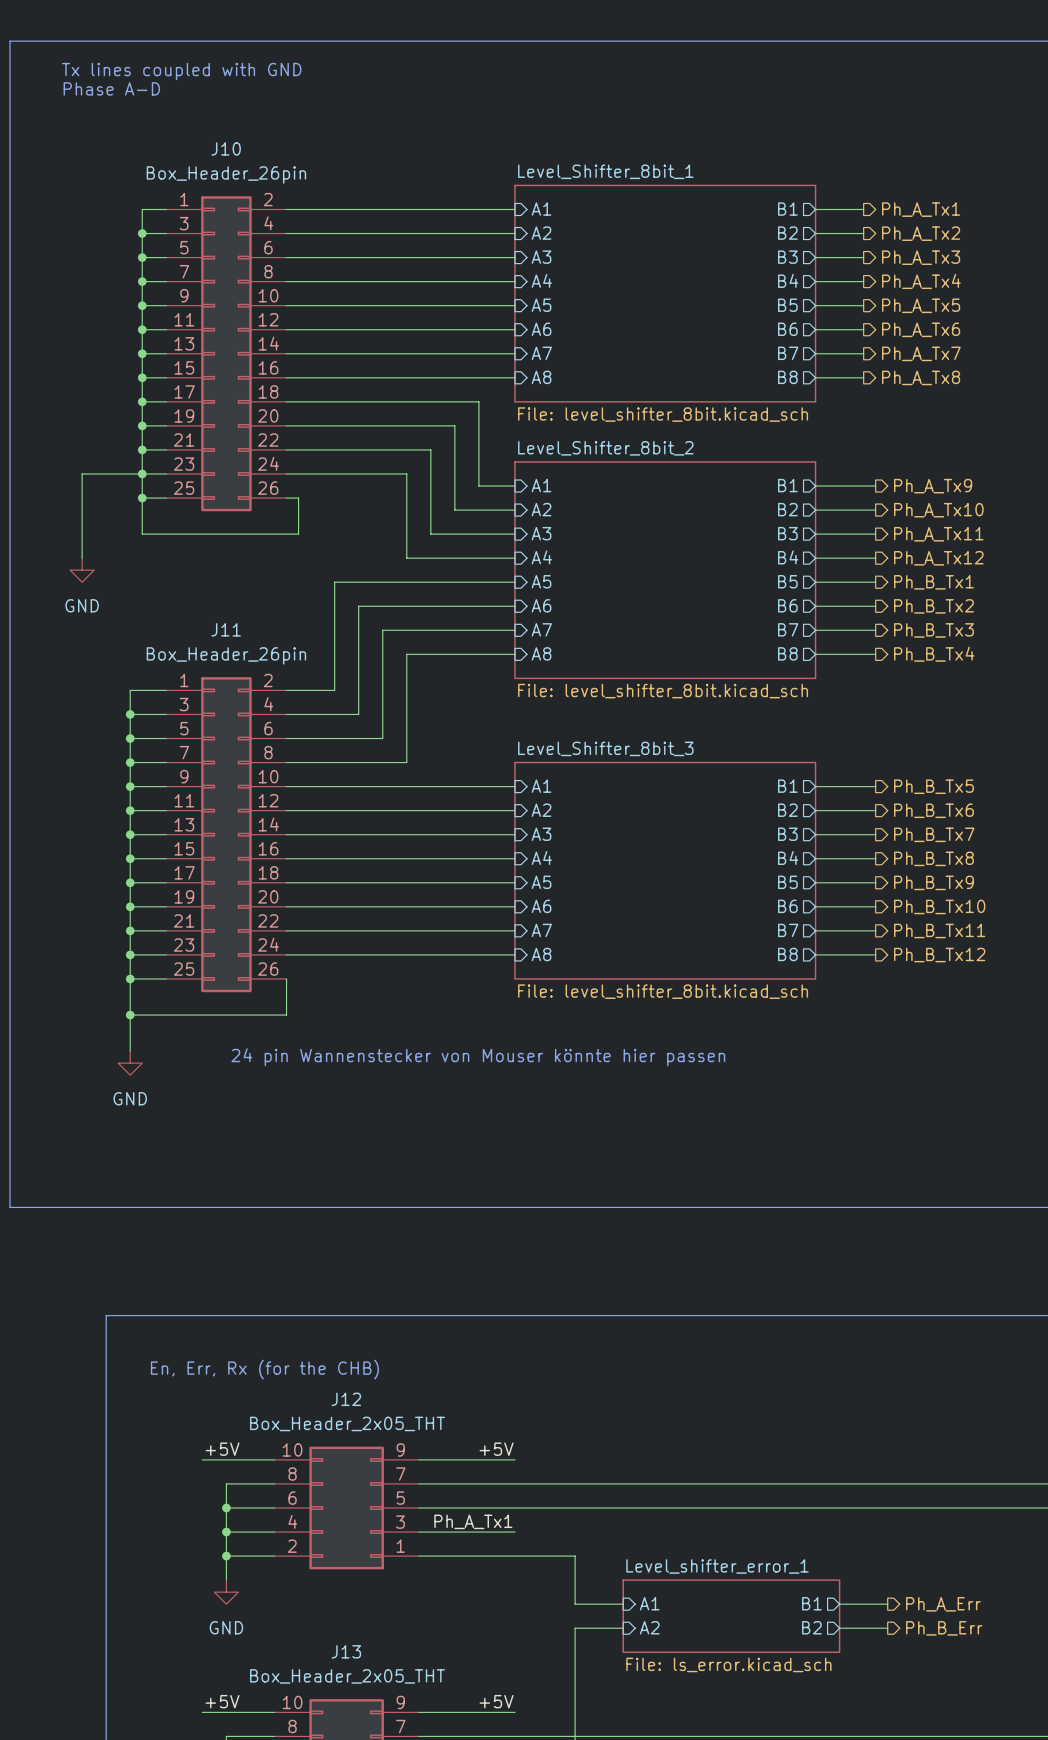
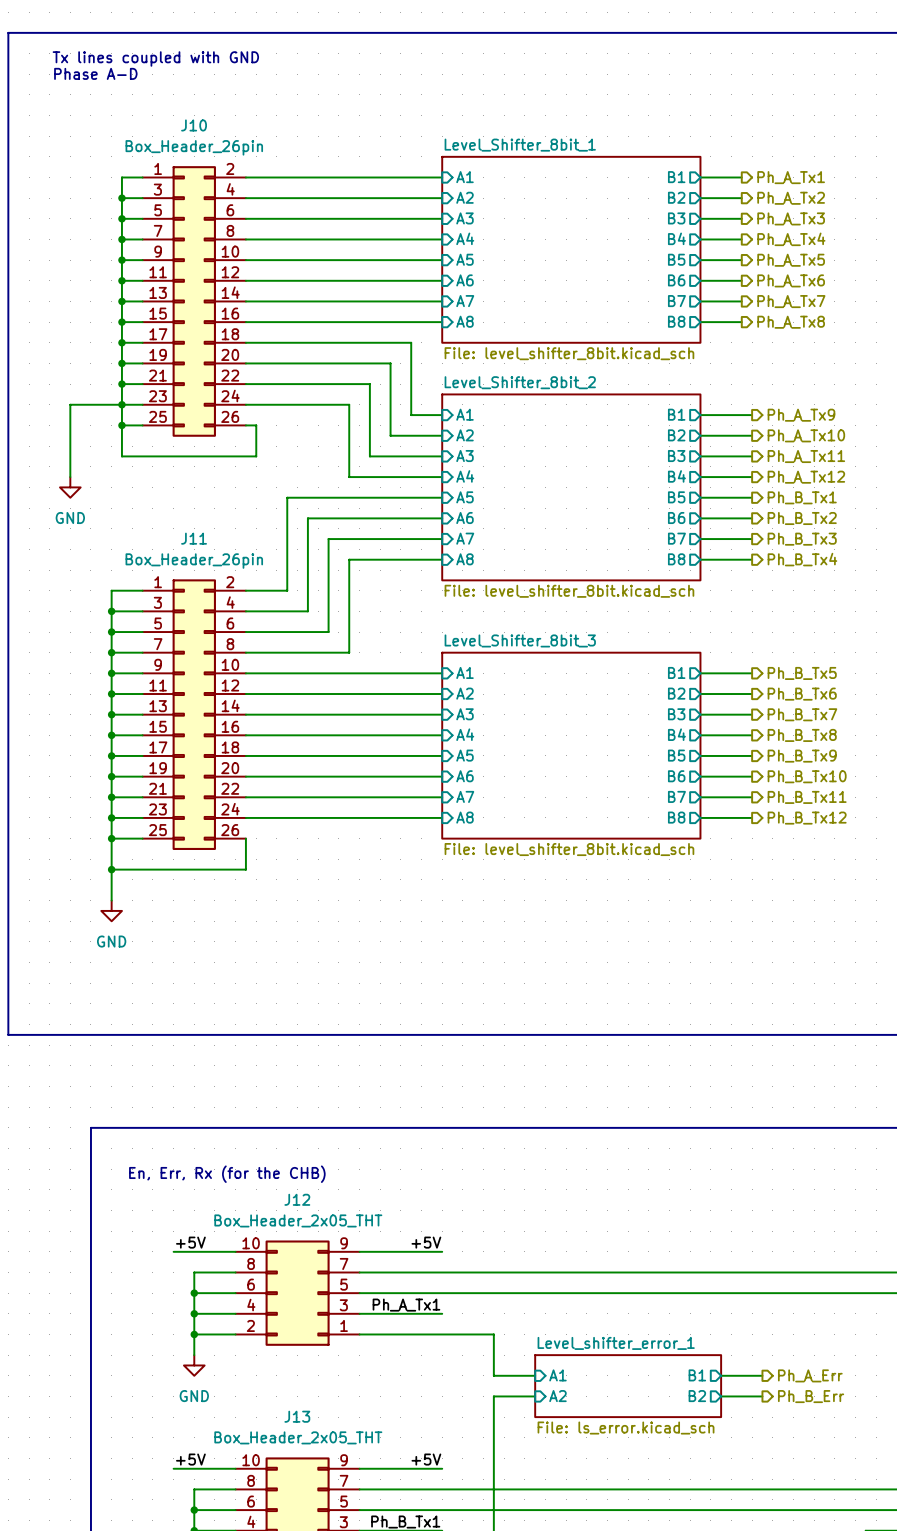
text: 24 pin Wannenstecker von Mouser könnte hier passen (478, 1057) -> none

